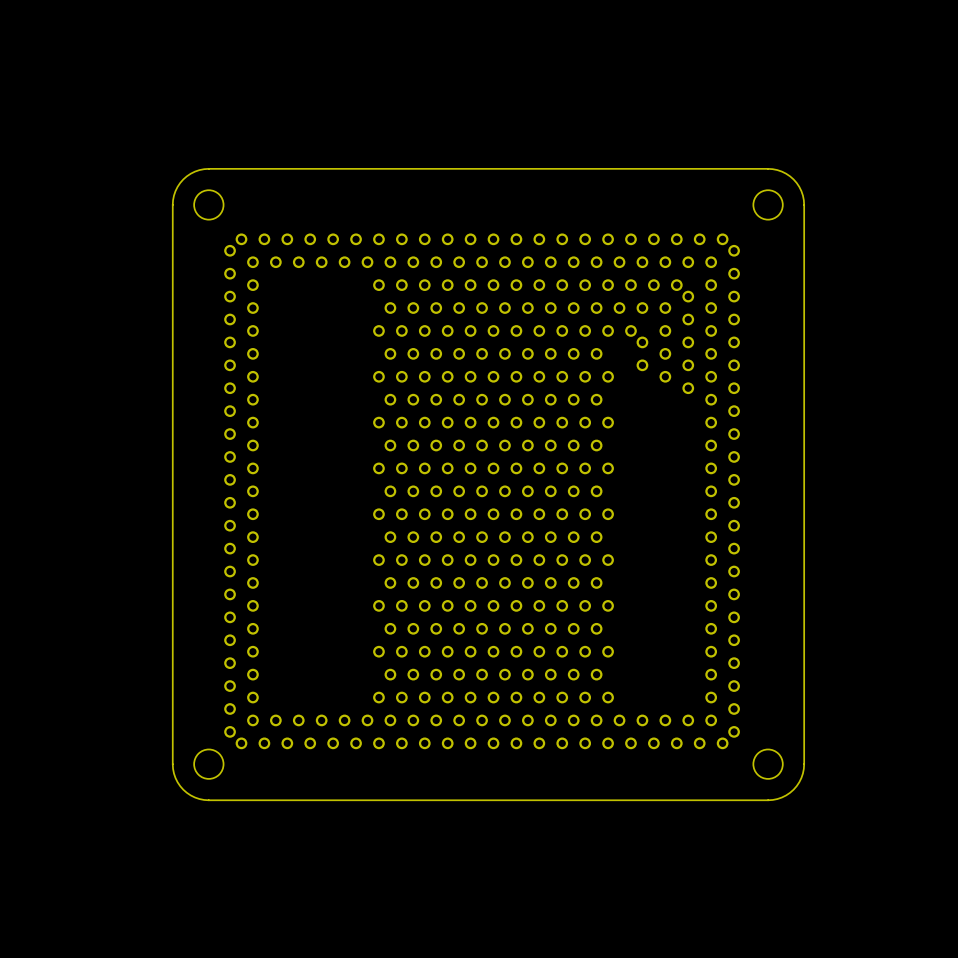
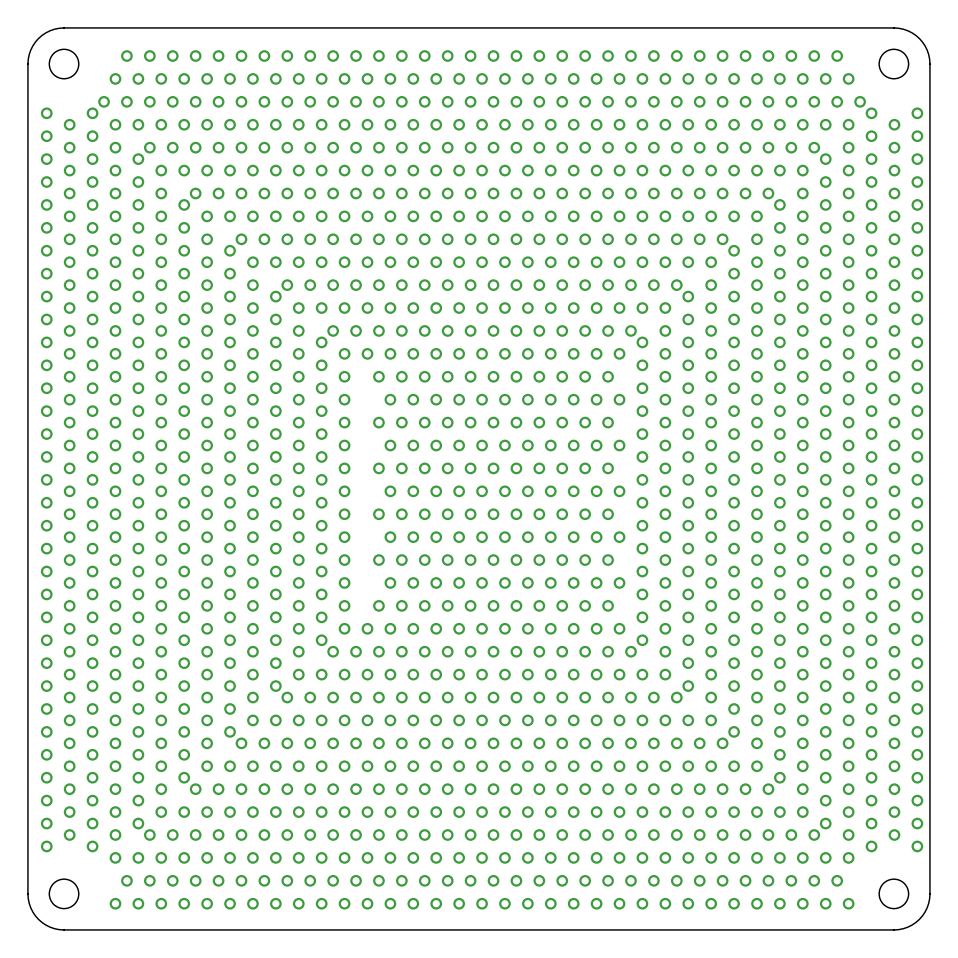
board edge: none -> (893, 27) (64, 27) (50, 30) (38, 38) (30, 50) (27, 64) (27, 893) (30, 907) (38, 919) (50, 927) (64, 929) (893, 929) (907, 927) (919, 919) (927, 907) (929, 893) (929, 64) (927, 50) (919, 38) (907, 30) (893, 27)
part: none -> (126, 56)
part: none -> (149, 56)
part: none -> (172, 56)
part: none -> (195, 56)
part: none -> (218, 56)
part: none -> (241, 56)
part: none -> (264, 56)
part: none -> (287, 56)
part: none -> (310, 56)
part: none -> (333, 56)
part: none -> (356, 56)
part: none -> (378, 56)
part: none -> (401, 56)
part: none -> (424, 56)
part: none -> (447, 56)
part: none -> (470, 56)
part: none -> (493, 56)
part: none -> (516, 56)
part: none -> (539, 56)
part: none -> (562, 56)
part: none -> (585, 56)
part: none -> (608, 56)
part: none -> (630, 56)
part: none -> (653, 56)
part: none -> (676, 56)
part: none -> (699, 56)
part: none -> (722, 56)
part: none -> (745, 56)
part: none -> (768, 56)
part: none -> (791, 56)
part: none -> (814, 56)
part: none -> (837, 56)
part: none -> (115, 78)
part: none -> (138, 78)
part: none -> (161, 78)
part: none -> (184, 78)
part: none -> (207, 78)
part: none -> (230, 78)
part: none -> (252, 78)
part: none -> (275, 78)
part: none -> (298, 78)
part: none -> (321, 78)
part: none -> (344, 78)
part: none -> (367, 78)
part: none -> (390, 78)
part: none -> (413, 78)
part: none -> (436, 78)
part: none -> (459, 78)
part: none -> (482, 78)
part: none -> (504, 78)
part: none -> (527, 78)
part: none -> (550, 78)
part: none -> (573, 78)
part: none -> (596, 78)
part: none -> (619, 78)
part: none -> (642, 78)
part: none -> (665, 78)
part: none -> (688, 78)
part: none -> (711, 78)
part: none -> (734, 78)
part: none -> (756, 78)
part: none -> (779, 78)
part: none -> (802, 78)
part: none -> (825, 78)
part: none -> (848, 78)
part: none -> (104, 101)
part: none -> (126, 101)
part: none -> (149, 101)
part: none -> (172, 101)
part: none -> (195, 101)
part: none -> (218, 101)
part: none -> (241, 101)
part: none -> (264, 101)
part: none -> (287, 101)
part: none -> (310, 101)
part: none -> (333, 101)
part: none -> (356, 101)
part: none -> (378, 101)
part: none -> (401, 101)
part: none -> (424, 101)
part: none -> (447, 101)
part: none -> (470, 101)
part: none -> (493, 101)
part: none -> (516, 101)
part: none -> (539, 101)
part: none -> (562, 101)
part: none -> (585, 101)
part: none -> (608, 101)
part: none -> (630, 101)
part: none -> (653, 101)
part: none -> (676, 101)
part: none -> (699, 101)
part: none -> (722, 101)
part: none -> (745, 101)
part: none -> (768, 101)
part: none -> (791, 101)
part: none -> (814, 101)
part: none -> (837, 101)
part: none -> (860, 101)
part: none -> (46, 113)
part: none -> (92, 113)
part: none -> (871, 113)
part: none -> (917, 113)
part: none -> (69, 124)
part: none -> (115, 124)
part: none -> (138, 124)
part: none -> (161, 124)
part: none -> (184, 124)
part: none -> (207, 124)
part: none -> (230, 124)
part: none -> (252, 124)
part: none -> (275, 124)
part: none -> (298, 124)
part: none -> (321, 124)
part: none -> (344, 124)
part: none -> (367, 124)
part: none -> (390, 124)
part: none -> (413, 124)
part: none -> (436, 124)
part: none -> (459, 124)
part: none -> (482, 124)
part: none -> (504, 124)
part: none -> (527, 124)
part: none -> (550, 124)
part: none -> (573, 124)
part: none -> (596, 124)
part: none -> (619, 124)
part: none -> (642, 124)
part: none -> (665, 124)
part: none -> (688, 124)
part: none -> (711, 124)
part: none -> (734, 124)
part: none -> (756, 124)
part: none -> (779, 124)
part: none -> (802, 124)
part: none -> (825, 124)
part: none -> (848, 124)
part: none -> (894, 124)
part: none -> (46, 136)
part: none -> (92, 136)
part: none -> (871, 136)
part: none -> (917, 136)
part: none -> (69, 147)
part: none -> (115, 147)
part: none -> (149, 147)
part: none -> (172, 147)
part: none -> (195, 147)
part: none -> (218, 147)
part: none -> (241, 147)
part: none -> (264, 147)
part: none -> (287, 147)
part: none -> (310, 147)
part: none -> (333, 147)
part: none -> (356, 147)
part: none -> (378, 147)
part: none -> (401, 147)
part: none -> (424, 147)
part: none -> (447, 147)
part: none -> (470, 147)
part: none -> (493, 147)
part: none -> (516, 147)
part: none -> (539, 147)
part: none -> (562, 147)
part: none -> (585, 147)
part: none -> (608, 147)
part: none -> (630, 147)
part: none -> (653, 147)
part: none -> (676, 147)
part: none -> (699, 147)
part: none -> (722, 147)
part: none -> (745, 147)
part: none -> (768, 147)
part: none -> (791, 147)
part: none -> (814, 147)
part: none -> (848, 147)
part: none -> (894, 147)
part: none -> (46, 159)
part: none -> (92, 159)
part: none -> (138, 159)
part: none -> (825, 159)
part: none -> (871, 159)
part: none -> (917, 159)
board edge: (768, 168) (208, 168) (195, 171) (183, 179) (175, 191) (172, 204) (172, 764) (175, 777) (183, 789) (195, 797) (208, 800) (768, 800) (781, 797) (793, 789) (801, 777) (804, 764) (804, 204) (801, 191) (793, 179) (781, 171) (768, 168) -> none
part: none -> (69, 170)
part: none -> (115, 170)
part: none -> (161, 170)
part: none -> (184, 170)
part: none -> (207, 170)
part: none -> (230, 170)
part: none -> (252, 170)
part: none -> (275, 170)
part: none -> (298, 170)
part: none -> (321, 170)
part: none -> (344, 170)
part: none -> (367, 170)
part: none -> (390, 170)
part: none -> (413, 170)
part: none -> (436, 170)
part: none -> (459, 170)
part: none -> (482, 170)
part: none -> (504, 170)
part: none -> (527, 170)
part: none -> (550, 170)
part: none -> (573, 170)
part: none -> (596, 170)
part: none -> (619, 170)
part: none -> (642, 170)
part: none -> (665, 170)
part: none -> (688, 170)
part: none -> (711, 170)
part: none -> (734, 170)
part: none -> (756, 170)
part: none -> (779, 170)
part: none -> (802, 170)
part: none -> (848, 170)
part: none -> (894, 170)
part: none -> (46, 182)
part: none -> (92, 182)
part: none -> (138, 182)
part: none -> (825, 182)
part: none -> (871, 182)
part: none -> (917, 182)
part: none -> (69, 193)
part: none -> (115, 193)
part: none -> (161, 193)
part: none -> (195, 193)
part: none -> (218, 193)
part: none -> (241, 193)
part: none -> (264, 193)
part: none -> (287, 193)
part: none -> (310, 193)
part: none -> (333, 193)
part: none -> (356, 193)
part: none -> (378, 193)
part: none -> (401, 193)
part: none -> (424, 193)
part: none -> (447, 193)
part: none -> (470, 193)
part: none -> (493, 193)
part: none -> (516, 193)
part: none -> (539, 193)
part: none -> (562, 193)
part: none -> (585, 193)
part: none -> (608, 193)
part: none -> (630, 193)
part: none -> (653, 193)
part: none -> (676, 193)
part: none -> (699, 193)
part: none -> (722, 193)
part: none -> (745, 193)
part: none -> (768, 193)
part: none -> (802, 193)
part: none -> (848, 193)
part: none -> (894, 193)
part: none -> (46, 204)
part: none -> (92, 204)
part: none -> (138, 204)
part: none -> (184, 204)
round board edge position: (208, 204) -> (64, 64)
round board edge position: (768, 204) -> (893, 64)
part: none -> (779, 204)
part: none -> (825, 204)
part: none -> (871, 204)
part: none -> (917, 204)
part: none -> (69, 216)
part: none -> (115, 216)
part: none -> (161, 216)
part: none -> (207, 216)
part: none -> (230, 216)
part: none -> (252, 216)
part: none -> (275, 216)
part: none -> (298, 216)
part: none -> (321, 216)
part: none -> (344, 216)
part: none -> (367, 216)
part: none -> (390, 216)
part: none -> (413, 216)
part: none -> (436, 216)
part: none -> (459, 216)
part: none -> (482, 216)
part: none -> (504, 216)
part: none -> (527, 216)
part: none -> (550, 216)
part: none -> (573, 216)
part: none -> (596, 216)
part: none -> (619, 216)
part: none -> (642, 216)
part: none -> (665, 216)
part: none -> (688, 216)
part: none -> (711, 216)
part: none -> (734, 216)
part: none -> (756, 216)
part: none -> (802, 216)
part: none -> (848, 216)
part: none -> (894, 216)
part: none -> (46, 227)
part: none -> (92, 227)
part: none -> (138, 227)
part: none -> (184, 227)
part: none -> (779, 227)
part: none -> (825, 227)
part: none -> (871, 227)
part: none -> (917, 227)
part: none -> (69, 239)
part: none -> (115, 239)
part: none -> (161, 239)
part: none -> (207, 239)
part: none -> (756, 239)
part: none -> (802, 239)
part: none -> (848, 239)
part: none -> (894, 239)
part: none -> (46, 250)
part: none -> (92, 250)
part: none -> (138, 250)
part: none -> (184, 250)
part: none -> (779, 250)
part: none -> (825, 250)
part: none -> (871, 250)
part: none -> (917, 250)
part: none -> (69, 262)
part: none -> (115, 262)
part: none -> (161, 262)
part: none -> (207, 262)
part: none -> (756, 262)
part: none -> (802, 262)
part: none -> (848, 262)
part: none -> (894, 262)
part: none -> (46, 273)
part: none -> (92, 273)
part: none -> (138, 273)
part: none -> (184, 273)
part: none -> (779, 273)
part: none -> (825, 273)
part: none -> (871, 273)
part: none -> (917, 273)
part: none -> (69, 285)
part: none -> (115, 285)
part: none -> (161, 285)
part: none -> (207, 285)
part: none -> (287, 285)
part: none -> (310, 285)
part: none -> (333, 285)
part: none -> (356, 285)
part: none -> (756, 285)
part: none -> (802, 285)
part: none -> (848, 285)
part: none -> (894, 285)
part: none -> (46, 296)
part: none -> (92, 296)
part: none -> (138, 296)
part: none -> (184, 296)
part: none -> (275, 296)
part: none -> (779, 296)
part: none -> (825, 296)
part: none -> (871, 296)
part: none -> (917, 296)
part: none -> (69, 308)
part: none -> (115, 308)
part: none -> (161, 308)
part: none -> (207, 308)
part: none -> (298, 308)
part: none -> (321, 308)
part: none -> (344, 308)
part: none -> (367, 308)
part: none -> (756, 308)
part: none -> (802, 308)
part: none -> (848, 308)
part: none -> (894, 308)
part: none -> (46, 319)
part: none -> (92, 319)
part: none -> (138, 319)
part: none -> (184, 319)
part: none -> (275, 319)
part: none -> (779, 319)
part: none -> (825, 319)
part: none -> (871, 319)
part: none -> (917, 319)
part: none -> (69, 330)
part: none -> (115, 330)
part: none -> (161, 330)
part: none -> (207, 330)
part: none -> (298, 330)
part: none -> (333, 330)
part: none -> (356, 330)
part: none -> (756, 330)
part: none -> (802, 330)
part: none -> (848, 330)
part: none -> (894, 330)
part: none -> (46, 342)
part: none -> (92, 342)
part: none -> (138, 342)
part: none -> (184, 342)
part: none -> (275, 342)
part: none -> (321, 342)
part: none -> (779, 342)
part: none -> (825, 342)
part: none -> (871, 342)
part: none -> (917, 342)
part: none -> (69, 353)
part: none -> (115, 353)
part: none -> (161, 353)
part: none -> (207, 353)
part: none -> (298, 353)
part: none -> (344, 353)
part: none -> (367, 353)
part: none -> (619, 353)
part: none -> (756, 353)
part: none -> (802, 353)
part: none -> (848, 353)
part: none -> (894, 353)
part: none -> (46, 365)
part: none -> (92, 365)
part: none -> (138, 365)
part: none -> (184, 365)
part: none -> (275, 365)
part: none -> (321, 365)
part: none -> (779, 365)
part: none -> (825, 365)
part: none -> (871, 365)
part: none -> (917, 365)
part: none -> (69, 376)
part: none -> (115, 376)
part: none -> (161, 376)
part: none -> (207, 376)
part: none -> (298, 376)
part: none -> (344, 376)
part: none -> (756, 376)
part: none -> (802, 376)
part: none -> (848, 376)
part: none -> (894, 376)
part: none -> (46, 388)
part: none -> (92, 388)
part: none -> (138, 388)
part: none -> (184, 388)
part: none -> (275, 388)
part: none -> (321, 388)
part: none -> (642, 388)
part: none -> (779, 388)
part: none -> (825, 388)
part: none -> (871, 388)
part: none -> (917, 388)
part: none -> (69, 399)
part: none -> (115, 399)
part: none -> (161, 399)
part: none -> (207, 399)
part: none -> (298, 399)
part: none -> (344, 399)
part: none -> (619, 399)
part: none -> (665, 399)
part: none -> (756, 399)
part: none -> (802, 399)
part: none -> (848, 399)
part: none -> (894, 399)
part: none -> (46, 411)
part: none -> (92, 411)
part: none -> (138, 411)
part: none -> (184, 411)
part: none -> (275, 411)
part: none -> (321, 411)
part: none -> (642, 411)
part: none -> (688, 411)
part: none -> (779, 411)
part: none -> (825, 411)
part: none -> (871, 411)
part: none -> (917, 411)
part: none -> (69, 422)
part: none -> (115, 422)
part: none -> (161, 422)
part: none -> (207, 422)
part: none -> (298, 422)
part: none -> (344, 422)
part: none -> (665, 422)
part: none -> (756, 422)
part: none -> (802, 422)
part: none -> (848, 422)
part: none -> (894, 422)
part: none -> (46, 434)
part: none -> (92, 434)
part: none -> (138, 434)
part: none -> (184, 434)
part: none -> (275, 434)
part: none -> (321, 434)
part: none -> (642, 434)
part: none -> (688, 434)
part: none -> (779, 434)
part: none -> (825, 434)
part: none -> (871, 434)
part: none -> (917, 434)
part: none -> (69, 445)
part: none -> (115, 445)
part: none -> (161, 445)
part: none -> (207, 445)
part: none -> (298, 445)
part: none -> (344, 445)
part: none -> (619, 445)
part: none -> (665, 445)
part: none -> (756, 445)
part: none -> (802, 445)
part: none -> (848, 445)
part: none -> (894, 445)
part: none -> (46, 456)
part: none -> (92, 456)
part: none -> (138, 456)
part: none -> (184, 456)
part: none -> (275, 456)
part: none -> (321, 456)
part: none -> (642, 456)
part: none -> (688, 456)
part: none -> (779, 456)
part: none -> (825, 456)
part: none -> (871, 456)
part: none -> (917, 456)
part: none -> (69, 468)
part: none -> (115, 468)
part: none -> (161, 468)
part: none -> (207, 468)
part: none -> (298, 468)
part: none -> (344, 468)
part: none -> (665, 468)
part: none -> (756, 468)
part: none -> (802, 468)
part: none -> (848, 468)
part: none -> (894, 468)
part: none -> (46, 479)
part: none -> (92, 479)
part: none -> (138, 479)
part: none -> (184, 479)
part: none -> (275, 479)
part: none -> (321, 479)
part: none -> (642, 479)
part: none -> (688, 479)
part: none -> (779, 479)
part: none -> (825, 479)
part: none -> (871, 479)
part: none -> (917, 479)
part: none -> (69, 491)
part: none -> (115, 491)
part: none -> (161, 491)
part: none -> (207, 491)
part: none -> (298, 491)
part: none -> (344, 491)
part: none -> (619, 491)
part: none -> (665, 491)
part: none -> (756, 491)
part: none -> (802, 491)
part: none -> (848, 491)
part: none -> (894, 491)
part: none -> (46, 502)
part: none -> (92, 502)
part: none -> (138, 502)
part: none -> (184, 502)
part: none -> (275, 502)
part: none -> (321, 502)
part: none -> (642, 502)
part: none -> (688, 502)
part: none -> (779, 502)
part: none -> (825, 502)
part: none -> (871, 502)
part: none -> (917, 502)
part: none -> (69, 514)
part: none -> (115, 514)
part: none -> (161, 514)
part: none -> (207, 514)
part: none -> (298, 514)
part: none -> (344, 514)
part: none -> (665, 514)
part: none -> (756, 514)
part: none -> (802, 514)
part: none -> (848, 514)
part: none -> (894, 514)
part: none -> (46, 525)
part: none -> (92, 525)
part: none -> (138, 525)
part: none -> (184, 525)
part: none -> (275, 525)
part: none -> (321, 525)
part: none -> (642, 525)
part: none -> (688, 525)
part: none -> (779, 525)
part: none -> (825, 525)
part: none -> (871, 525)
part: none -> (917, 525)
part: none -> (69, 537)
part: none -> (115, 537)
part: none -> (161, 537)
part: none -> (207, 537)
part: none -> (298, 537)
part: none -> (344, 537)
part: none -> (619, 537)
part: none -> (665, 537)
part: none -> (756, 537)
part: none -> (802, 537)
part: none -> (848, 537)
part: none -> (894, 537)
part: none -> (46, 548)
part: none -> (92, 548)
part: none -> (138, 548)
part: none -> (184, 548)
part: none -> (275, 548)
part: none -> (321, 548)
part: none -> (642, 548)
part: none -> (688, 548)
part: none -> (779, 548)
part: none -> (825, 548)
part: none -> (871, 548)
part: none -> (917, 548)
part: none -> (69, 560)
part: none -> (115, 560)
part: none -> (161, 560)
part: none -> (207, 560)
part: none -> (298, 560)
part: none -> (344, 560)
part: none -> (665, 560)
part: none -> (756, 560)
part: none -> (802, 560)
part: none -> (848, 560)
part: none -> (894, 560)
part: none -> (46, 571)
part: none -> (92, 571)
part: none -> (138, 571)
part: none -> (184, 571)
part: none -> (275, 571)
part: none -> (321, 571)
part: none -> (642, 571)
part: none -> (688, 571)
part: none -> (779, 571)
part: none -> (825, 571)
part: none -> (871, 571)
part: none -> (917, 571)
part: none -> (69, 582)
part: none -> (115, 582)
part: none -> (161, 582)
part: none -> (207, 582)
part: none -> (298, 582)
part: none -> (344, 582)
part: none -> (619, 582)
part: none -> (665, 582)
part: none -> (756, 582)
part: none -> (802, 582)
part: none -> (848, 582)
part: none -> (894, 582)
part: none -> (46, 594)
part: none -> (92, 594)
part: none -> (138, 594)
part: none -> (184, 594)
part: none -> (275, 594)
part: none -> (321, 594)
part: none -> (642, 594)
part: none -> (688, 594)
part: none -> (779, 594)
part: none -> (825, 594)
part: none -> (871, 594)
part: none -> (917, 594)
part: none -> (69, 605)
part: none -> (115, 605)
part: none -> (161, 605)
part: none -> (207, 605)
part: none -> (298, 605)
part: none -> (344, 605)
part: none -> (665, 605)
part: none -> (756, 605)
part: none -> (802, 605)
part: none -> (848, 605)
part: none -> (894, 605)
part: none -> (46, 617)
part: none -> (92, 617)
part: none -> (138, 617)
part: none -> (184, 617)
part: none -> (275, 617)
part: none -> (321, 617)
part: none -> (642, 617)
part: none -> (688, 617)
part: none -> (779, 617)
part: none -> (825, 617)
part: none -> (871, 617)
part: none -> (917, 617)
part: none -> (69, 628)
part: none -> (115, 628)
part: none -> (161, 628)
part: none -> (207, 628)
part: none -> (298, 628)
part: none -> (344, 628)
part: none -> (367, 628)
part: none -> (619, 628)
part: none -> (665, 628)
part: none -> (756, 628)
part: none -> (802, 628)
part: none -> (848, 628)
part: none -> (894, 628)
part: none -> (46, 640)
part: none -> (92, 640)
part: none -> (138, 640)
part: none -> (184, 640)
part: none -> (275, 640)
part: none -> (321, 640)
part: none -> (642, 640)
part: none -> (688, 640)
part: none -> (779, 640)
part: none -> (825, 640)
part: none -> (871, 640)
part: none -> (917, 640)
part: none -> (69, 651)
part: none -> (115, 651)
part: none -> (161, 651)
part: none -> (207, 651)
part: none -> (298, 651)
part: none -> (333, 651)
part: none -> (356, 651)
part: none -> (630, 651)
part: none -> (665, 651)
part: none -> (756, 651)
part: none -> (802, 651)
part: none -> (848, 651)
part: none -> (894, 651)
part: none -> (46, 663)
part: none -> (92, 663)
part: none -> (138, 663)
part: none -> (184, 663)
part: none -> (275, 663)
part: none -> (688, 663)
part: none -> (779, 663)
part: none -> (825, 663)
part: none -> (871, 663)
part: none -> (917, 663)
part: none -> (69, 674)
part: none -> (115, 674)
part: none -> (161, 674)
part: none -> (207, 674)
part: none -> (298, 674)
part: none -> (321, 674)
part: none -> (344, 674)
part: none -> (367, 674)
part: none -> (619, 674)
part: none -> (642, 674)
part: none -> (665, 674)
part: none -> (756, 674)
part: none -> (802, 674)
part: none -> (848, 674)
part: none -> (894, 674)
part: none -> (46, 686)
part: none -> (92, 686)
part: none -> (138, 686)
part: none -> (184, 686)
part: none -> (275, 686)
part: none -> (688, 686)
part: none -> (779, 686)
part: none -> (825, 686)
part: none -> (871, 686)
part: none -> (917, 686)
part: none -> (69, 697)
part: none -> (115, 697)
part: none -> (161, 697)
part: none -> (207, 697)
part: none -> (287, 697)
part: none -> (310, 697)
part: none -> (333, 697)
part: none -> (356, 697)
part: none -> (630, 697)
part: none -> (653, 697)
part: none -> (676, 697)
part: none -> (756, 697)
part: none -> (802, 697)
part: none -> (848, 697)
part: none -> (894, 697)
part: none -> (46, 708)
part: none -> (92, 708)
part: none -> (138, 708)
part: none -> (184, 708)
part: none -> (779, 708)
part: none -> (825, 708)
part: none -> (871, 708)
part: none -> (917, 708)
part: none -> (69, 720)
part: none -> (115, 720)
part: none -> (161, 720)
part: none -> (207, 720)
part: none -> (756, 720)
part: none -> (802, 720)
part: none -> (848, 720)
part: none -> (894, 720)
part: none -> (46, 731)
part: none -> (92, 731)
part: none -> (138, 731)
part: none -> (184, 731)
part: none -> (779, 731)
part: none -> (825, 731)
part: none -> (871, 731)
part: none -> (917, 731)
part: none -> (69, 743)
part: none -> (115, 743)
part: none -> (161, 743)
part: none -> (207, 743)
part: none -> (756, 743)
part: none -> (802, 743)
part: none -> (848, 743)
part: none -> (894, 743)
part: none -> (46, 754)
part: none -> (92, 754)
part: none -> (138, 754)
part: none -> (184, 754)
part: none -> (779, 754)
part: none -> (825, 754)
part: none -> (871, 754)
part: none -> (917, 754)
round board edge position: (208, 764) -> (64, 893)
round board edge position: (768, 764) -> (893, 893)
part: none -> (69, 766)
part: none -> (115, 766)
part: none -> (161, 766)
part: none -> (207, 766)
part: none -> (230, 766)
part: none -> (252, 766)
part: none -> (275, 766)
part: none -> (298, 766)
part: none -> (321, 766)
part: none -> (344, 766)
part: none -> (367, 766)
part: none -> (390, 766)
part: none -> (413, 766)
part: none -> (436, 766)
part: none -> (459, 766)
part: none -> (482, 766)
part: none -> (504, 766)
part: none -> (527, 766)
part: none -> (550, 766)
part: none -> (573, 766)
part: none -> (596, 766)
part: none -> (619, 766)
part: none -> (642, 766)
part: none -> (665, 766)
part: none -> (688, 766)
part: none -> (711, 766)
part: none -> (734, 766)
part: none -> (756, 766)
part: none -> (802, 766)
part: none -> (848, 766)
part: none -> (894, 766)
part: none -> (46, 777)
part: none -> (92, 777)
part: none -> (138, 777)
part: none -> (184, 777)
part: none -> (779, 777)
part: none -> (825, 777)
part: none -> (871, 777)
part: none -> (917, 777)
part: none -> (69, 789)
part: none -> (115, 789)
part: none -> (161, 789)
part: none -> (195, 789)
part: none -> (218, 789)
part: none -> (241, 789)
part: none -> (264, 789)
part: none -> (287, 789)
part: none -> (310, 789)
part: none -> (333, 789)
part: none -> (356, 789)
part: none -> (378, 789)
part: none -> (401, 789)
part: none -> (424, 789)
part: none -> (447, 789)
part: none -> (470, 789)
part: none -> (493, 789)
part: none -> (516, 789)
part: none -> (539, 789)
part: none -> (562, 789)
part: none -> (585, 789)
part: none -> (608, 789)
part: none -> (630, 789)
part: none -> (653, 789)
part: none -> (676, 789)
part: none -> (699, 789)
part: none -> (722, 789)
part: none -> (745, 789)
part: none -> (768, 789)
part: none -> (802, 789)
part: none -> (848, 789)
part: none -> (894, 789)
part: none -> (46, 800)
part: none -> (92, 800)
part: none -> (138, 800)
part: none -> (825, 800)
part: none -> (871, 800)
part: none -> (917, 800)
part: none -> (69, 812)
part: none -> (115, 812)
part: none -> (161, 812)
part: none -> (184, 812)
part: none -> (207, 812)
part: none -> (230, 812)
part: none -> (252, 812)
part: none -> (275, 812)
part: none -> (298, 812)
part: none -> (321, 812)
part: none -> (344, 812)
part: none -> (367, 812)
part: none -> (390, 812)
part: none -> (413, 812)
part: none -> (436, 812)
part: none -> (459, 812)
part: none -> (482, 812)
part: none -> (504, 812)
part: none -> (527, 812)
part: none -> (550, 812)
part: none -> (573, 812)
part: none -> (596, 812)
part: none -> (619, 812)
part: none -> (642, 812)
part: none -> (665, 812)
part: none -> (688, 812)
part: none -> (711, 812)
part: none -> (734, 812)
part: none -> (756, 812)
part: none -> (779, 812)
part: none -> (802, 812)
part: none -> (848, 812)
part: none -> (894, 812)
part: none -> (46, 823)
part: none -> (92, 823)
part: none -> (138, 823)
part: none -> (825, 823)
part: none -> (871, 823)
part: none -> (917, 823)
part: none -> (69, 834)
part: none -> (115, 834)
part: none -> (149, 834)
part: none -> (172, 834)
part: none -> (195, 834)
part: none -> (218, 834)
part: none -> (241, 834)
part: none -> (264, 834)
part: none -> (287, 834)
part: none -> (310, 834)
part: none -> (333, 834)
part: none -> (356, 834)
part: none -> (378, 834)
part: none -> (401, 834)
part: none -> (424, 834)
part: none -> (447, 834)
part: none -> (470, 834)
part: none -> (493, 834)
part: none -> (516, 834)
part: none -> (539, 834)
part: none -> (562, 834)
part: none -> (585, 834)
part: none -> (608, 834)
part: none -> (630, 834)
part: none -> (653, 834)
part: none -> (676, 834)
part: none -> (699, 834)
part: none -> (722, 834)
part: none -> (745, 834)
part: none -> (768, 834)
part: none -> (791, 834)
part: none -> (814, 834)
part: none -> (848, 834)
part: none -> (894, 834)
part: none -> (46, 846)
part: none -> (92, 846)
part: none -> (871, 846)
part: none -> (917, 846)
part: none -> (115, 857)
part: none -> (138, 857)
part: none -> (161, 857)
part: none -> (184, 857)
part: none -> (207, 857)
part: none -> (230, 857)
part: none -> (252, 857)
part: none -> (275, 857)
part: none -> (298, 857)
part: none -> (321, 857)
part: none -> (344, 857)
part: none -> (367, 857)
part: none -> (390, 857)
part: none -> (413, 857)
part: none -> (436, 857)
part: none -> (459, 857)
part: none -> (482, 857)
part: none -> (504, 857)
part: none -> (527, 857)
part: none -> (550, 857)
part: none -> (573, 857)
part: none -> (596, 857)
part: none -> (619, 857)
part: none -> (642, 857)
part: none -> (665, 857)
part: none -> (688, 857)
part: none -> (711, 857)
part: none -> (734, 857)
part: none -> (756, 857)
part: none -> (779, 857)
part: none -> (802, 857)
part: none -> (825, 857)
part: none -> (848, 857)
part: none -> (126, 880)
part: none -> (149, 880)
part: none -> (172, 880)
part: none -> (195, 880)
part: none -> (218, 880)
part: none -> (241, 880)
part: none -> (264, 880)
part: none -> (287, 880)
part: none -> (310, 880)
part: none -> (333, 880)
part: none -> (356, 880)
part: none -> (378, 880)
part: none -> (401, 880)
part: none -> (424, 880)
part: none -> (447, 880)
part: none -> (470, 880)
part: none -> (493, 880)
part: none -> (516, 880)
part: none -> (539, 880)
part: none -> (562, 880)
part: none -> (585, 880)
part: none -> (608, 880)
part: none -> (630, 880)
part: none -> (653, 880)
part: none -> (676, 880)
part: none -> (699, 880)
part: none -> (722, 880)
part: none -> (745, 880)
part: none -> (768, 880)
part: none -> (791, 880)
part: none -> (814, 880)
part: none -> (837, 880)
part: none -> (115, 903)
part: none -> (138, 903)
part: none -> (161, 903)
part: none -> (184, 903)
part: none -> (207, 903)
part: none -> (230, 903)
part: none -> (252, 903)
part: none -> (275, 903)
part: none -> (298, 903)
part: none -> (321, 903)
part: none -> (344, 903)
part: none -> (367, 903)
part: none -> (390, 903)
part: none -> (413, 903)
part: none -> (436, 903)
part: none -> (459, 903)
part: none -> (482, 903)
part: none -> (504, 903)
part: none -> (527, 903)
part: none -> (550, 903)
part: none -> (573, 903)
part: none -> (596, 903)
part: none -> (619, 903)
part: none -> (642, 903)
part: none -> (665, 903)
part: none -> (688, 903)
part: none -> (711, 903)
part: none -> (734, 903)
part: none -> (756, 903)
part: none -> (779, 903)
part: none -> (802, 903)
part: none -> (825, 903)
part: none -> (848, 903)

